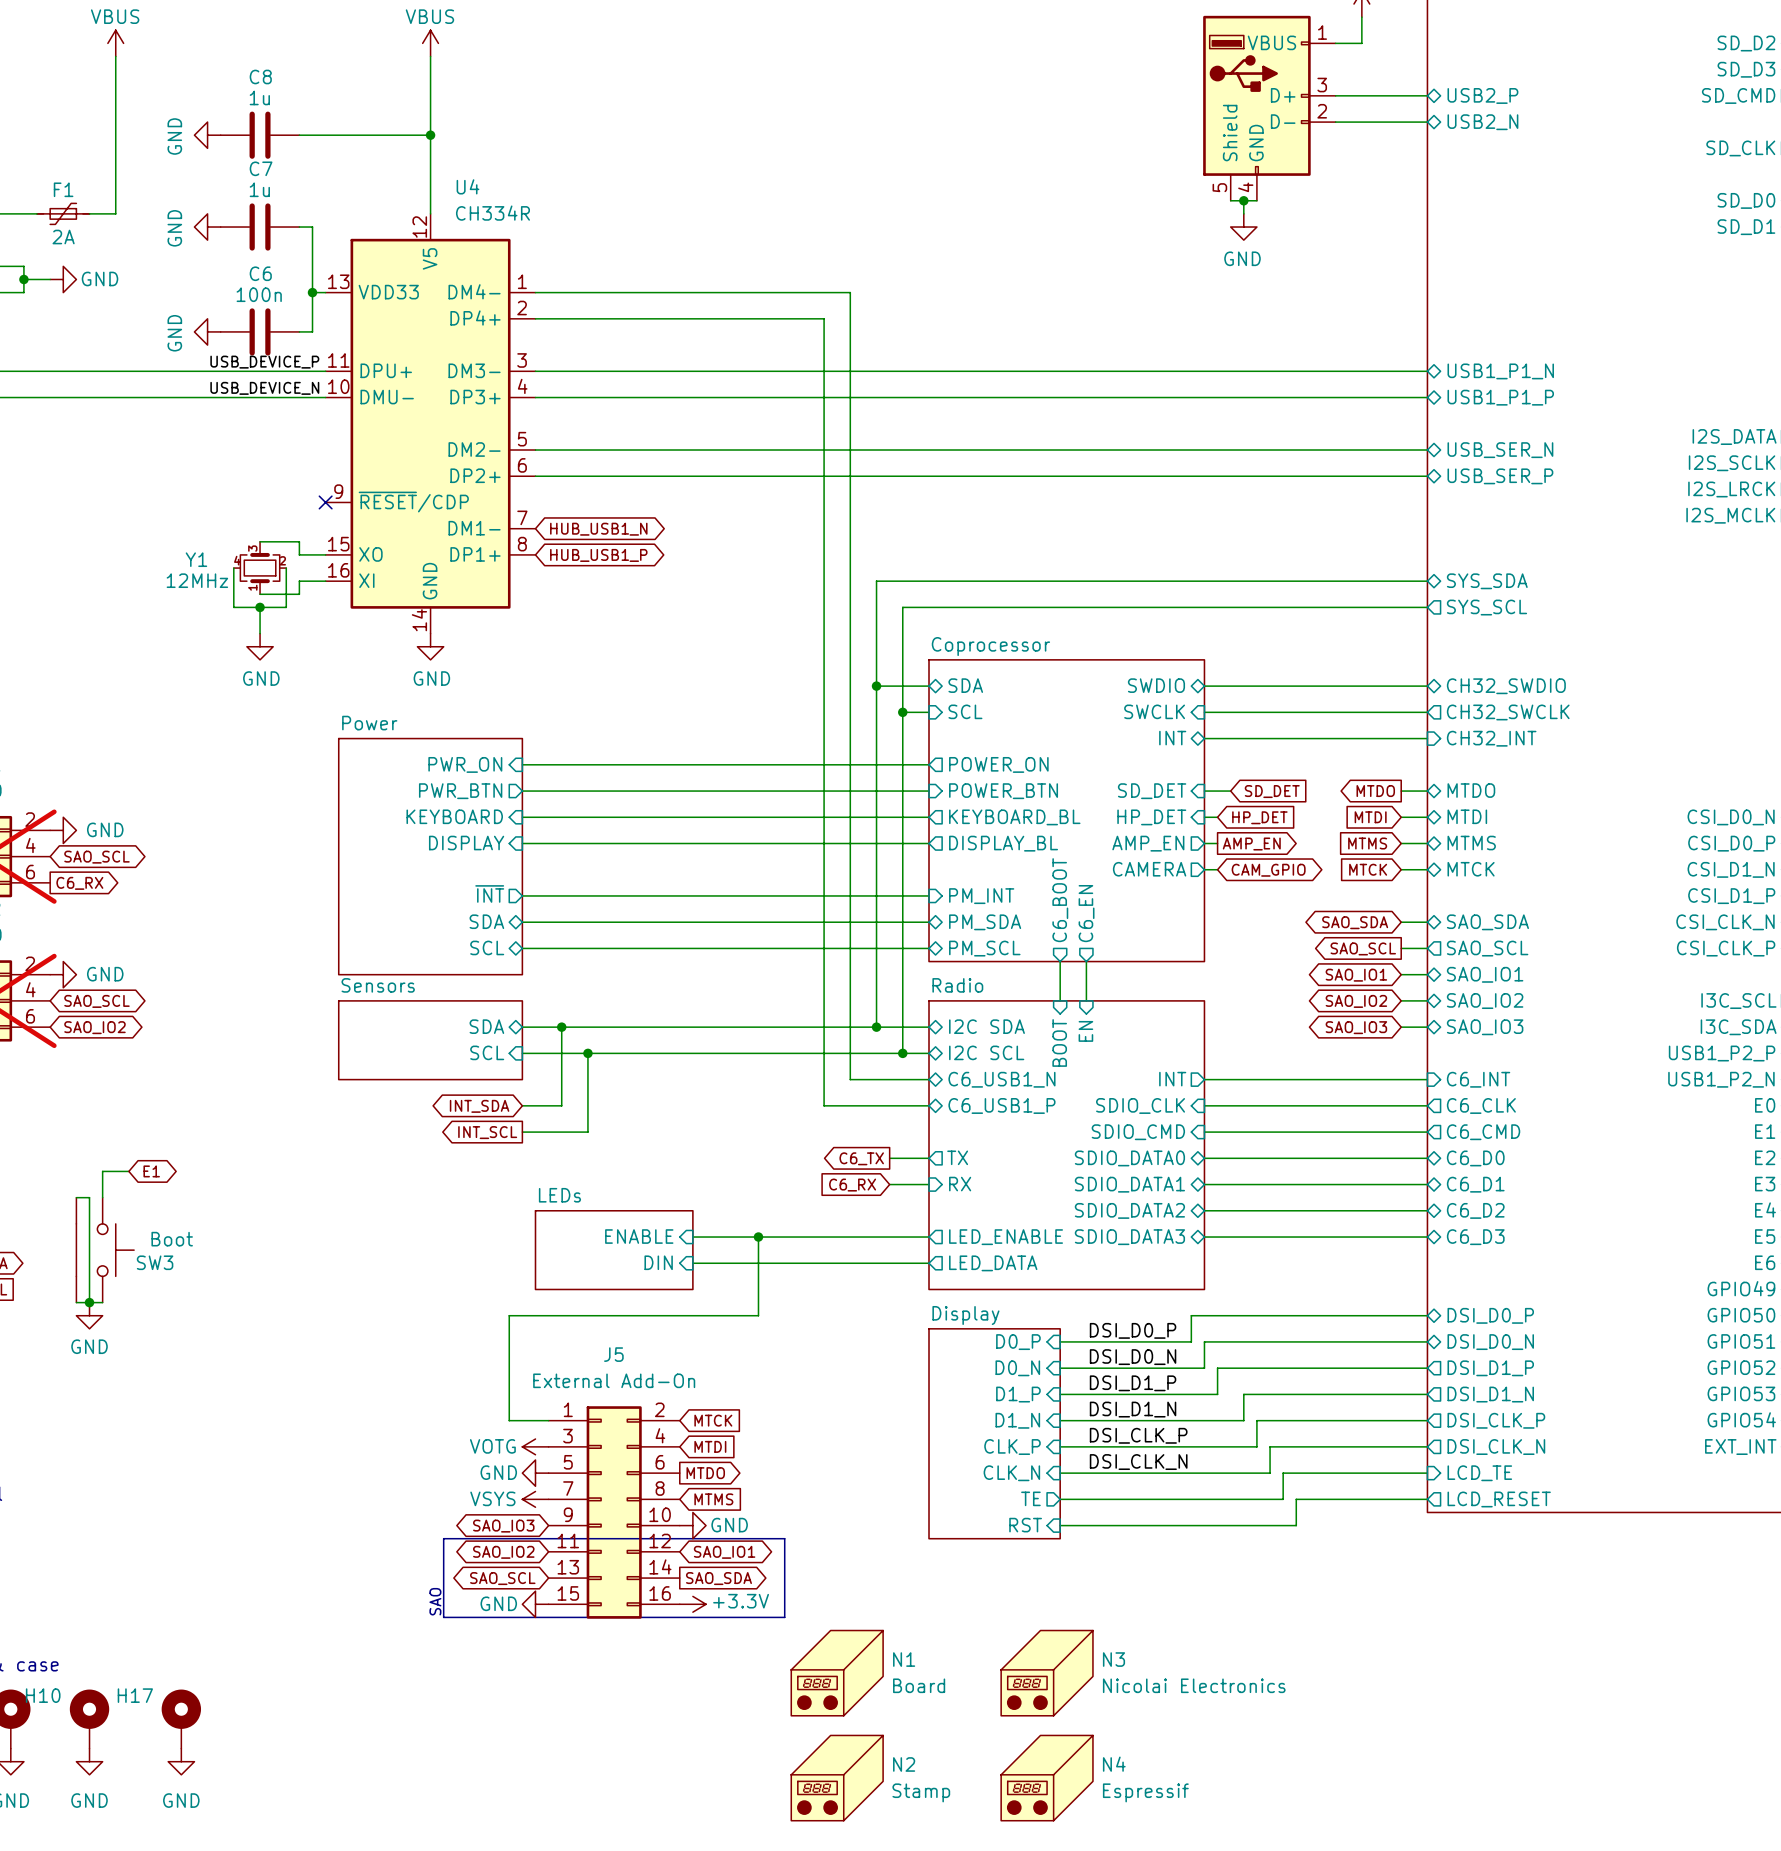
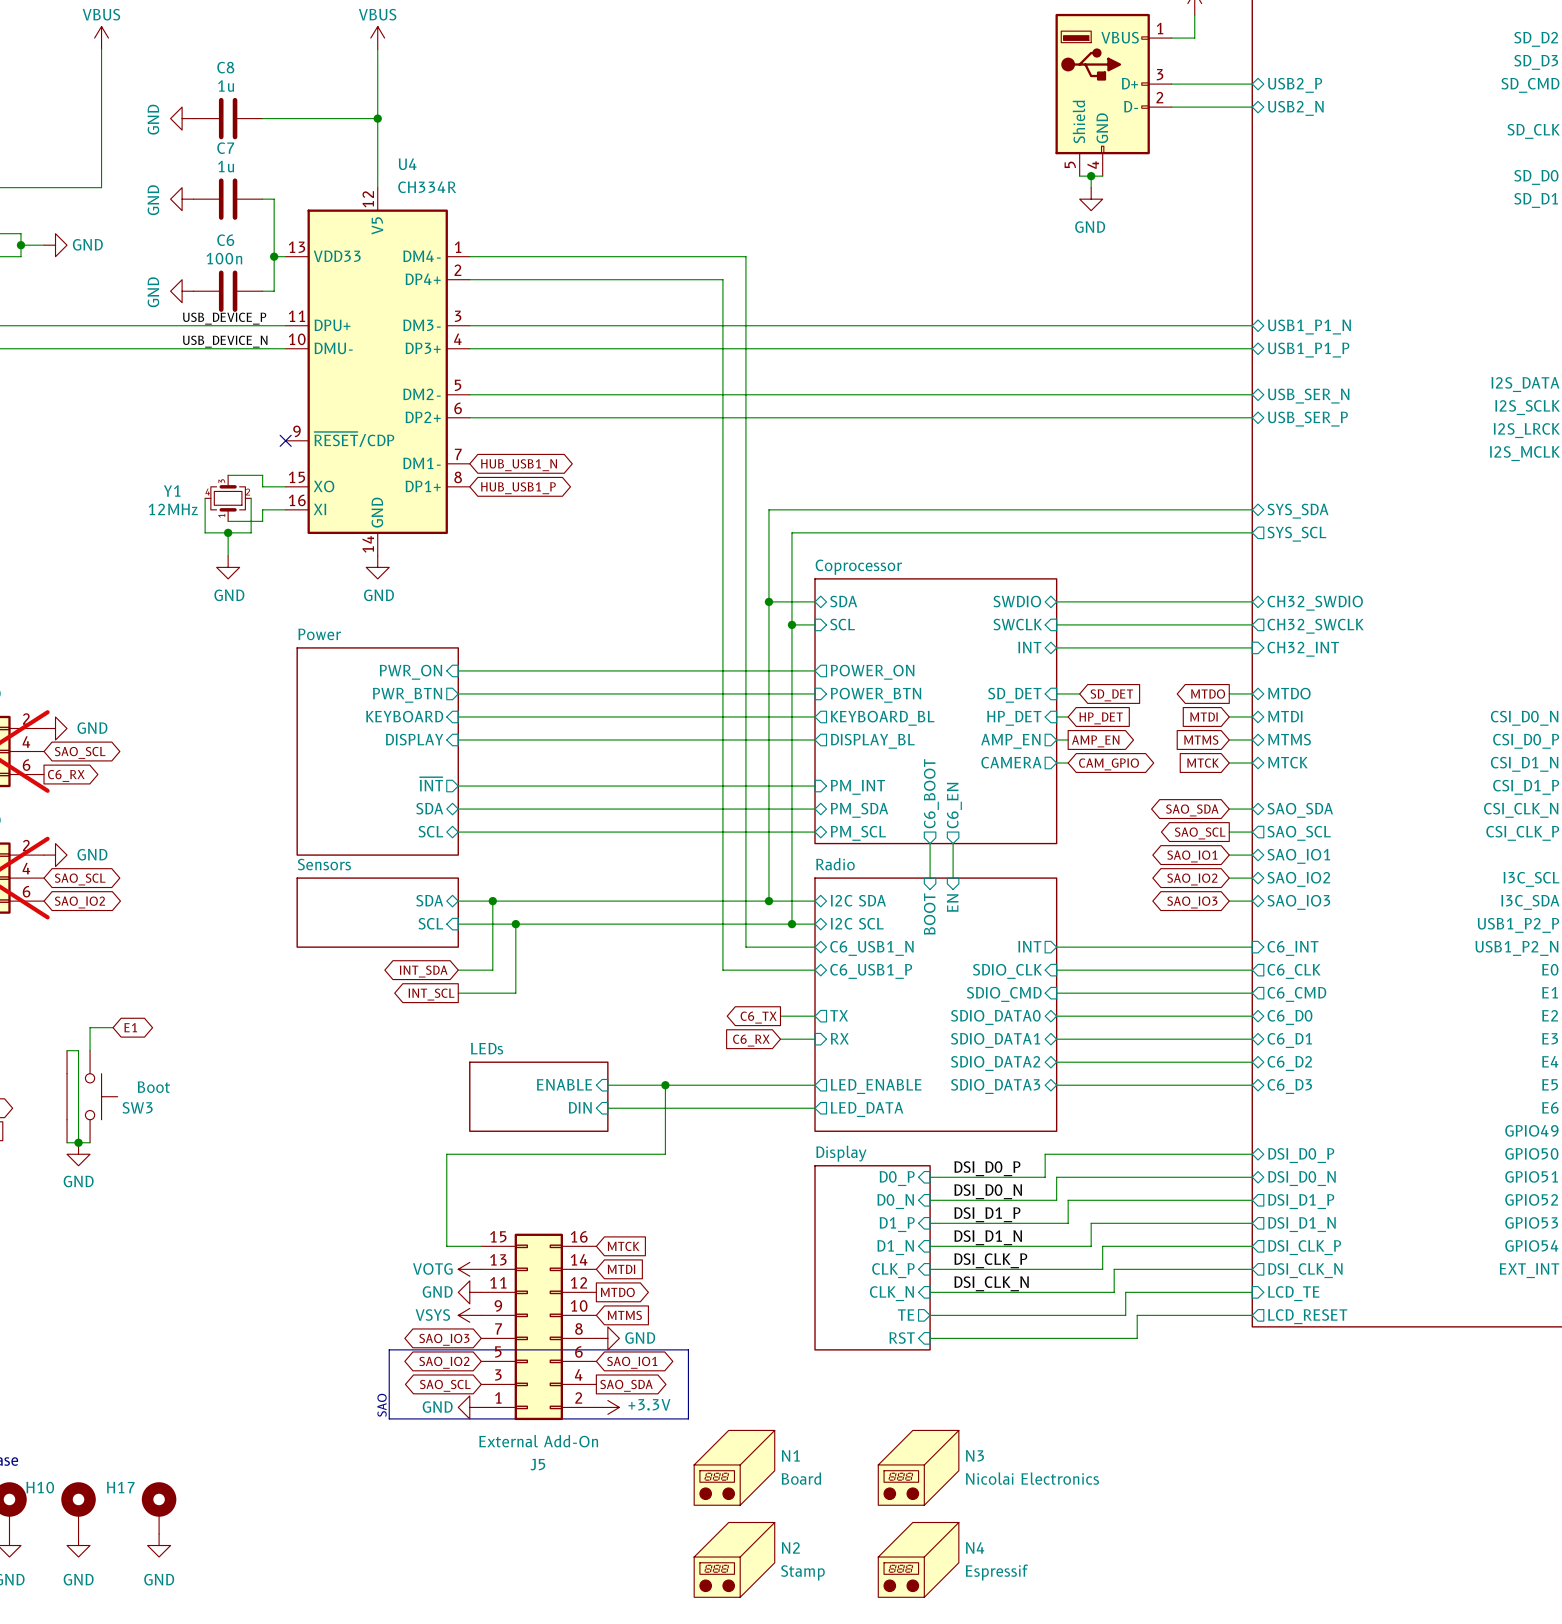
F1: 2A (63, 213) -> none
J5 flip: as is (614, 1512) -> up-down (538, 1326)

